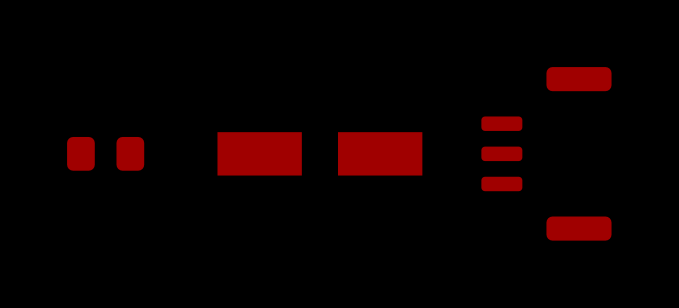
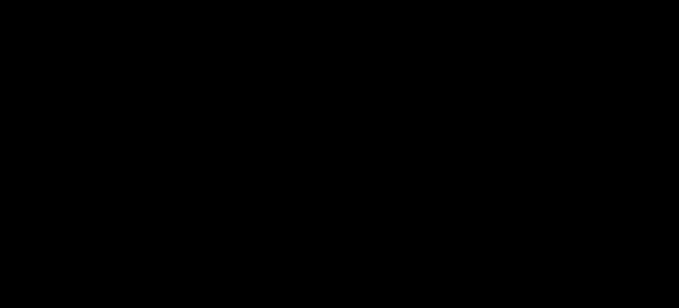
part: (105, 153) -> none
part: (319, 153) -> none
part: (546, 153) -> none

